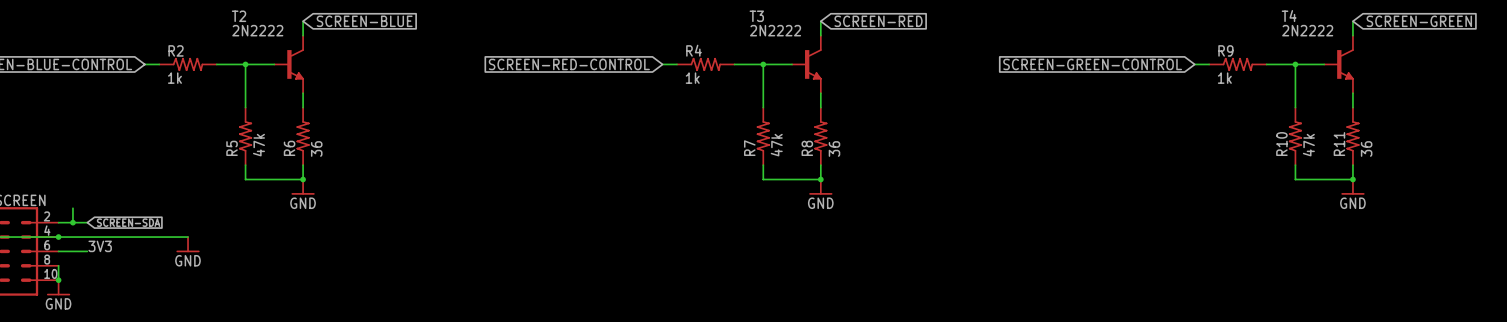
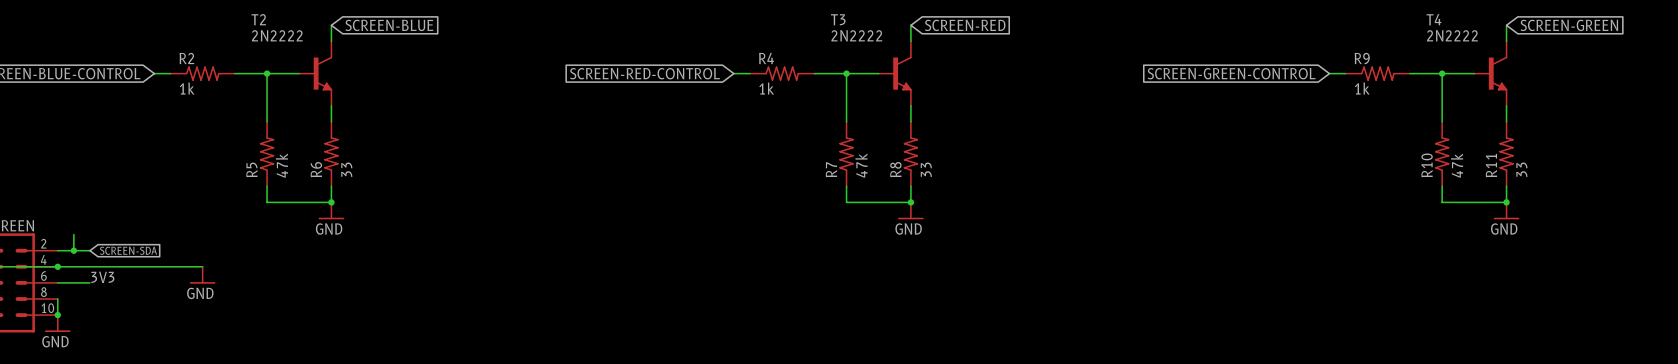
R6 value: 36 (316, 148) -> 33 (346, 169)
R8 value: 36 (834, 148) -> 33 (926, 169)
R11 value: 36 (1366, 148) -> 33 (1521, 169)

